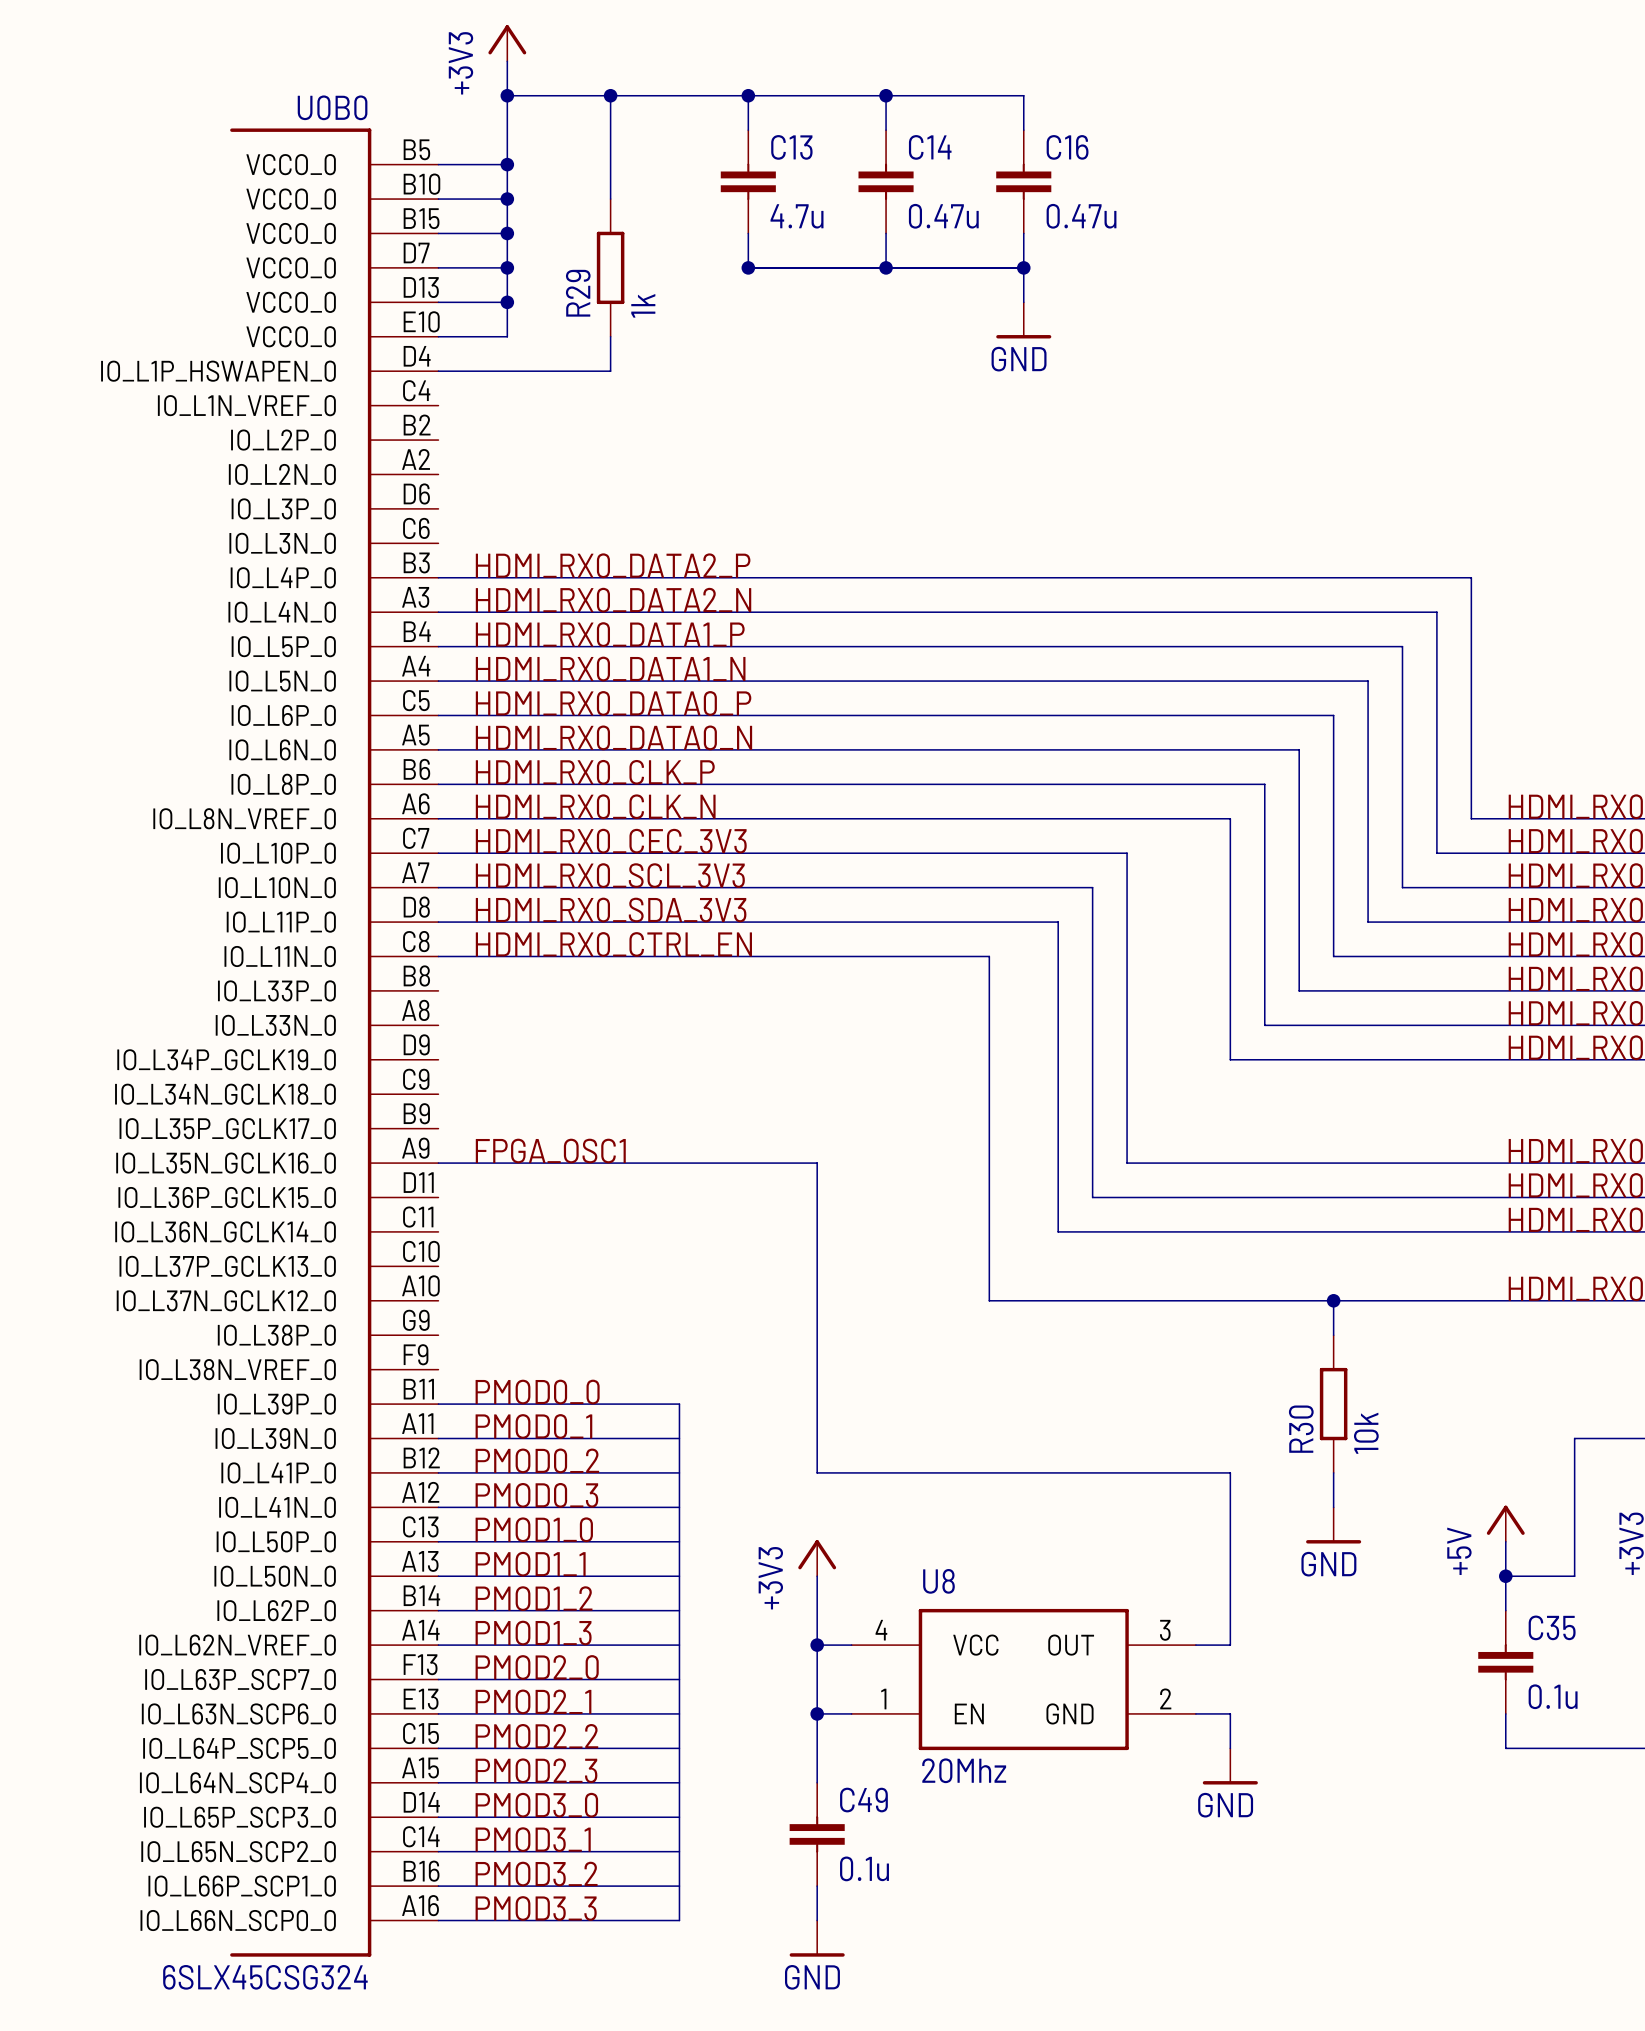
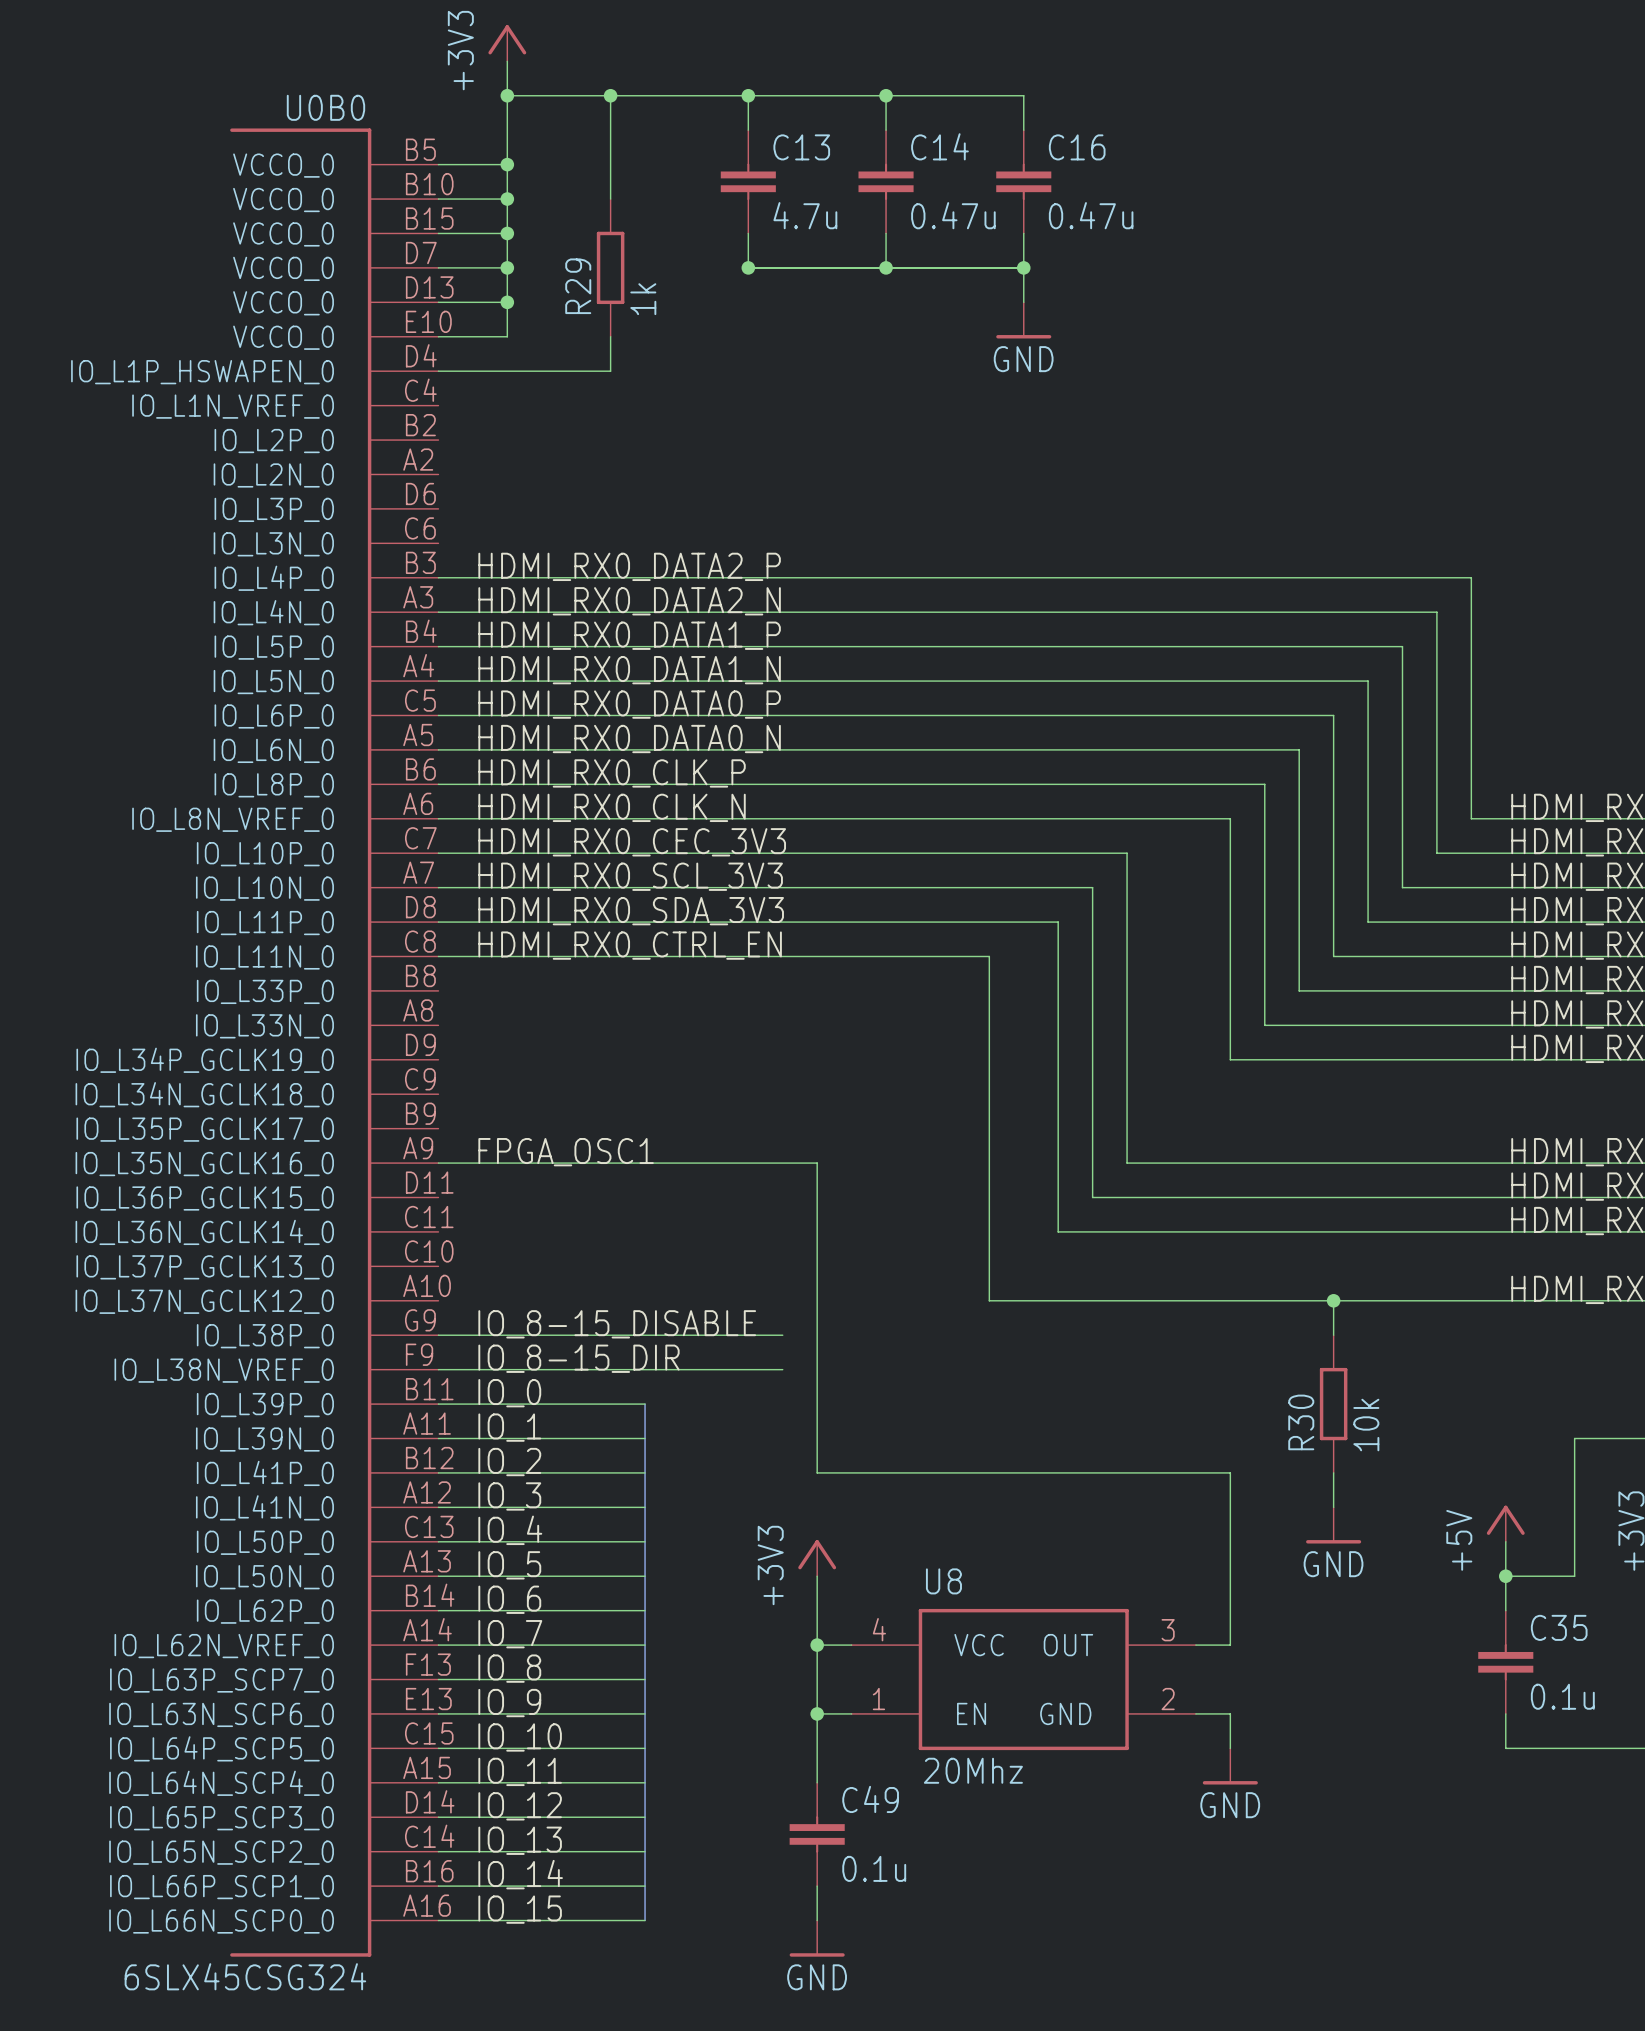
label: none -> IO_8-15_DISABLE (617, 1324)
wire: none -> (438, 1335) (782, 1335)
label: none -> IO_8-15_DIR (578, 1358)
wire: none -> (438, 1369) (782, 1369)
label: PMOD0_0 (537, 1392) -> IO_0 (509, 1393)
wire: (645, 1404) (679, 1404) -> none
bus: (679, 1404) (679, 1920) -> (645, 1404) (645, 1920)
label: PMOD0_1 (533, 1426) -> IO_1 (509, 1427)
wire: (645, 1438) (679, 1438) -> none
label: PMOD0_2 (537, 1460) -> IO_2 (509, 1462)
wire: (645, 1472) (679, 1472) -> none
label: PMOD0_3 (536, 1495) -> IO_3 (509, 1496)
wire: (645, 1507) (679, 1507) -> none
label: PMOD1_0 (534, 1529) -> IO_4 (510, 1530)
wire: (645, 1541) (679, 1541) -> none
label: PMOD1_1 (530, 1564) -> IO_5 (509, 1565)
wire: (645, 1576) (679, 1576) -> none
label: PMOD1_2 (534, 1598) -> IO_6 (509, 1599)
wire: (645, 1610) (679, 1610) -> none
label: PMOD1_3 (533, 1633) -> IO_7 (510, 1634)
wire: (645, 1645) (679, 1645) -> none
label: PMOD2_0 (537, 1667) -> IO_8 (509, 1668)
wire: (645, 1679) (679, 1679) -> none
label: PMOD2_1 (533, 1701) -> IO_9 (509, 1703)
wire: (645, 1713) (679, 1713) -> none
label: PMOD2_2 (536, 1736) -> IO_10 (520, 1737)
wire: (645, 1748) (679, 1748) -> none
label: PMOD2_3 (536, 1770) -> IO_11 (520, 1771)
wire: (645, 1782) (679, 1782) -> none
label: PMOD3_0 (536, 1805) -> IO_12 (520, 1806)
wire: (645, 1817) (679, 1817) -> none
label: PMOD3_1 (533, 1839) -> IO_13 (520, 1840)
wire: (645, 1851) (679, 1851) -> none
label: PMOD3_2 (536, 1874) -> IO_14 (520, 1874)
wire: (645, 1886) (679, 1886) -> none
label: PMOD3_3 (536, 1908) -> IO_15 (520, 1909)
wire: (645, 1920) (679, 1920) -> none

